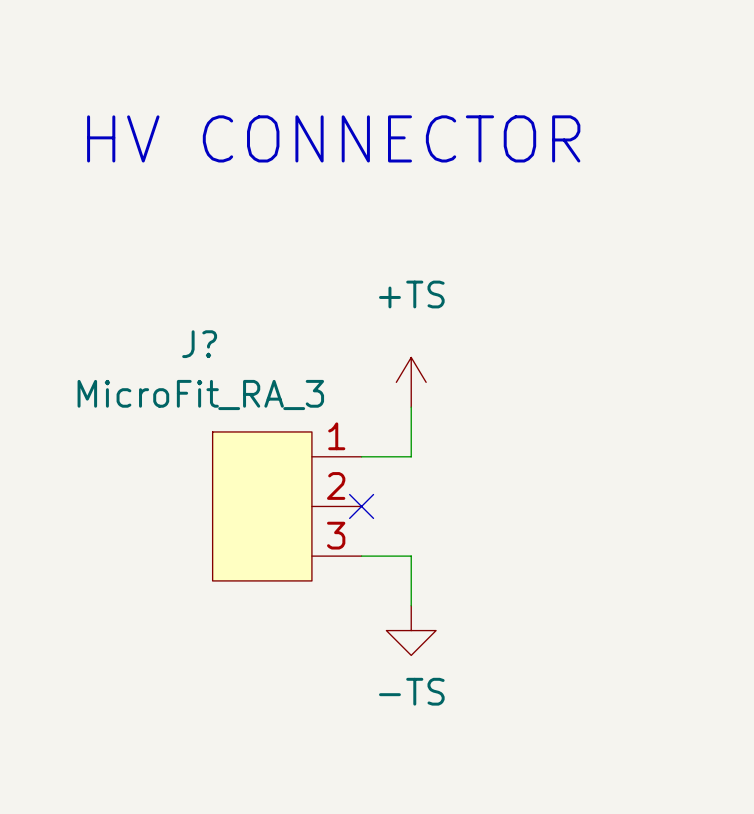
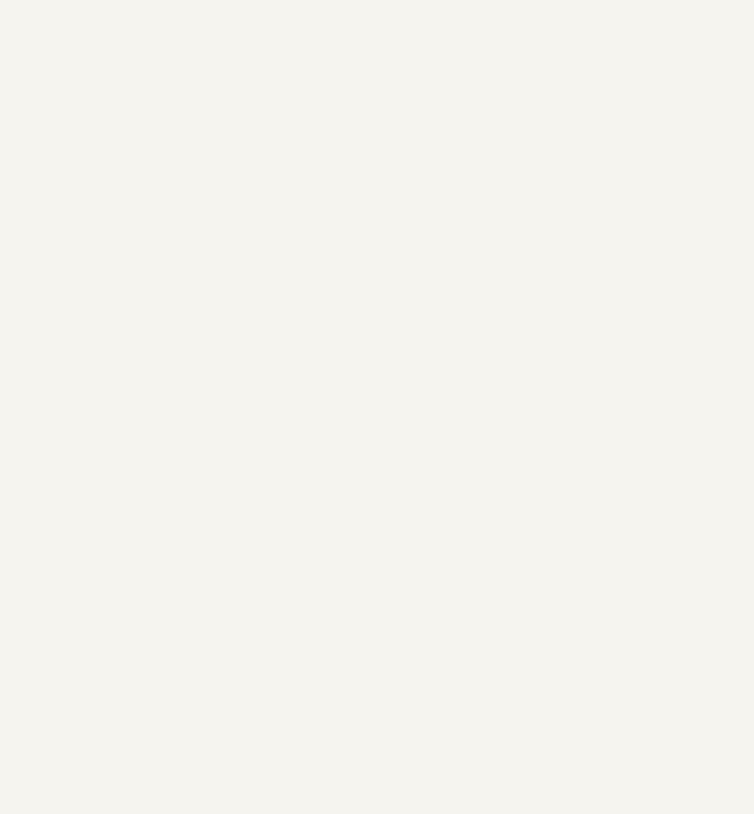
text: HV CONNECTOR (333, 138) -> none
power symbol: +TS (411, 382) -> none
wire: (411, 407) (411, 456) (361, 456) -> none
J?: MicroFit_RA_3 (287, 506) -> none
no-connect mark: (361, 506) -> none
wire: (361, 556) (411, 556) (411, 605) -> none
power symbol: -TS (411, 630) -> none

